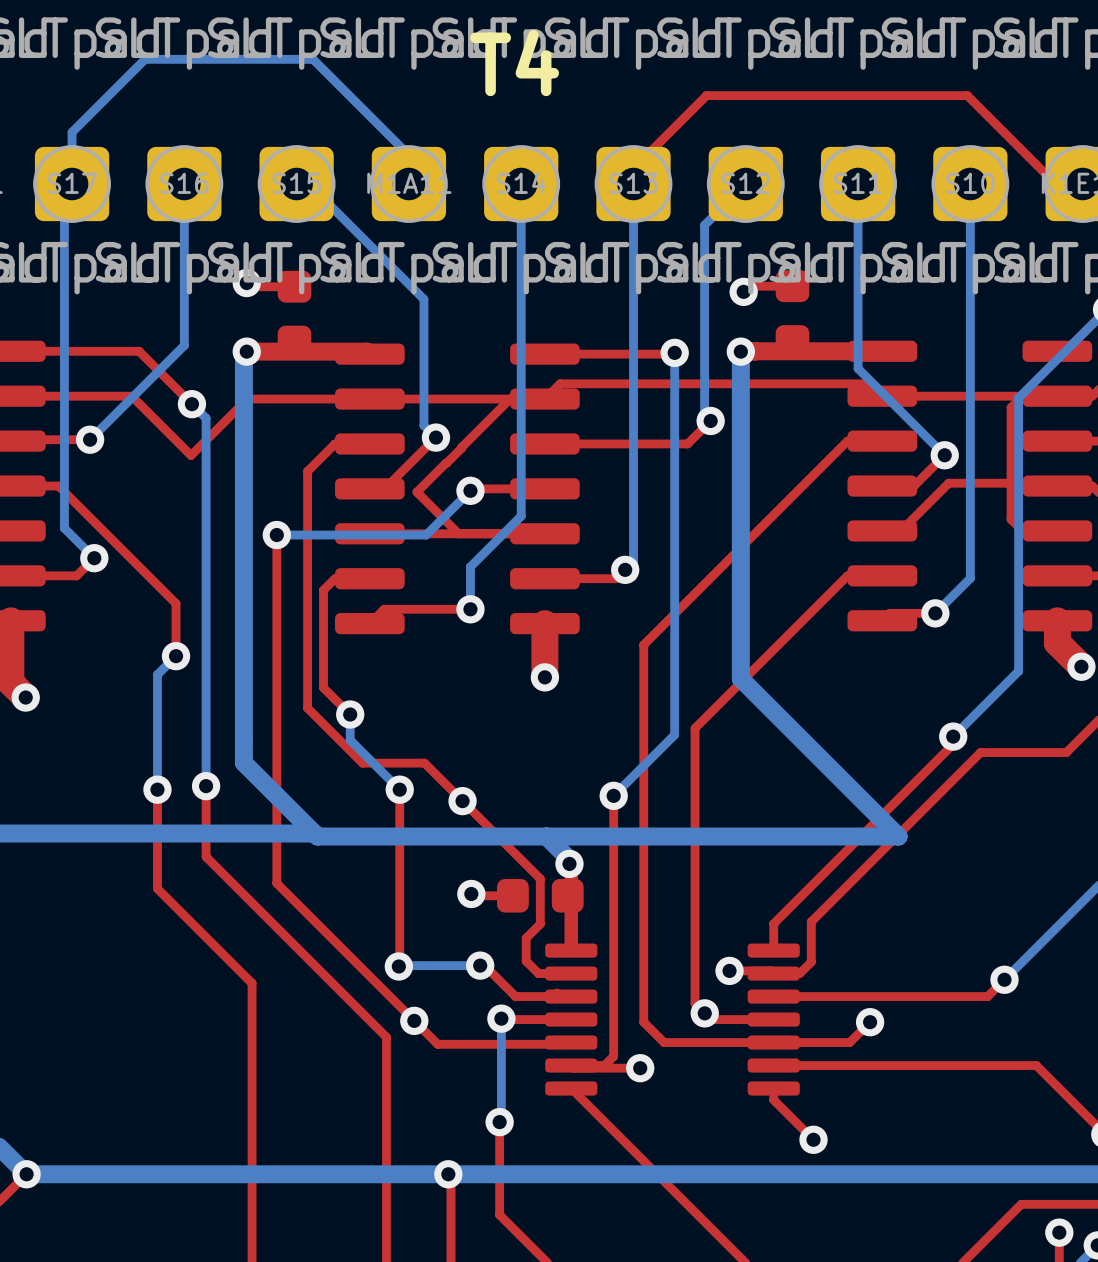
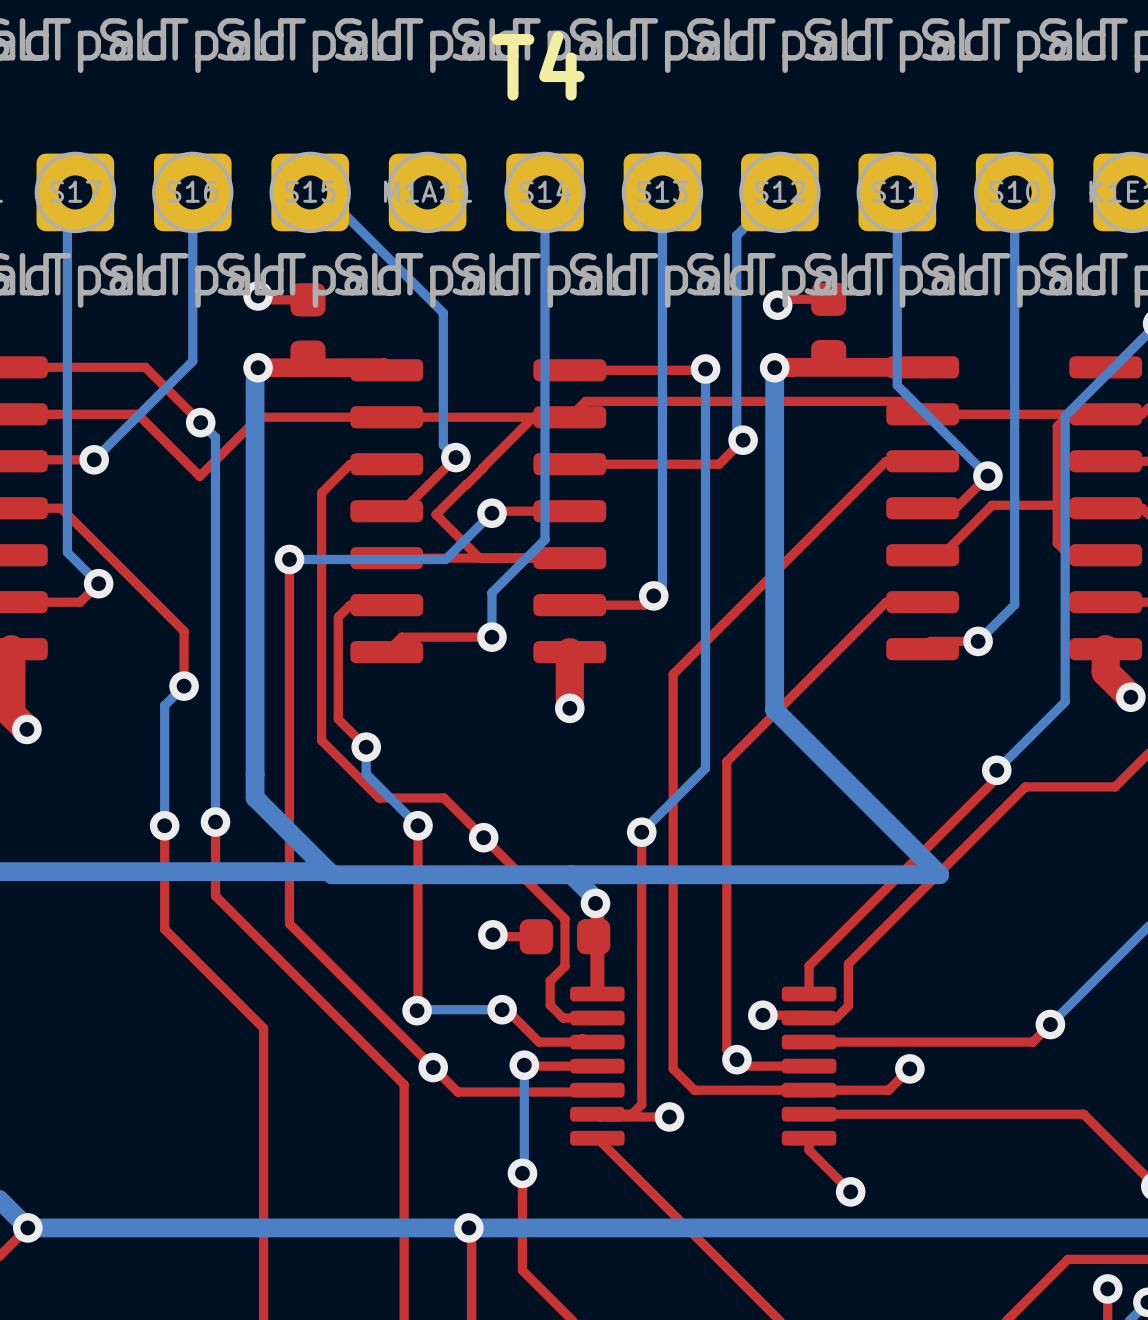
bottom track: (408, 184) (408, 155) (313, 59) (145, 59) (72, 132) (72, 184) -> none
top track: (1082, 184) (1055, 184) (967, 95) (706, 95) (633, 168) (633, 184) -> none

